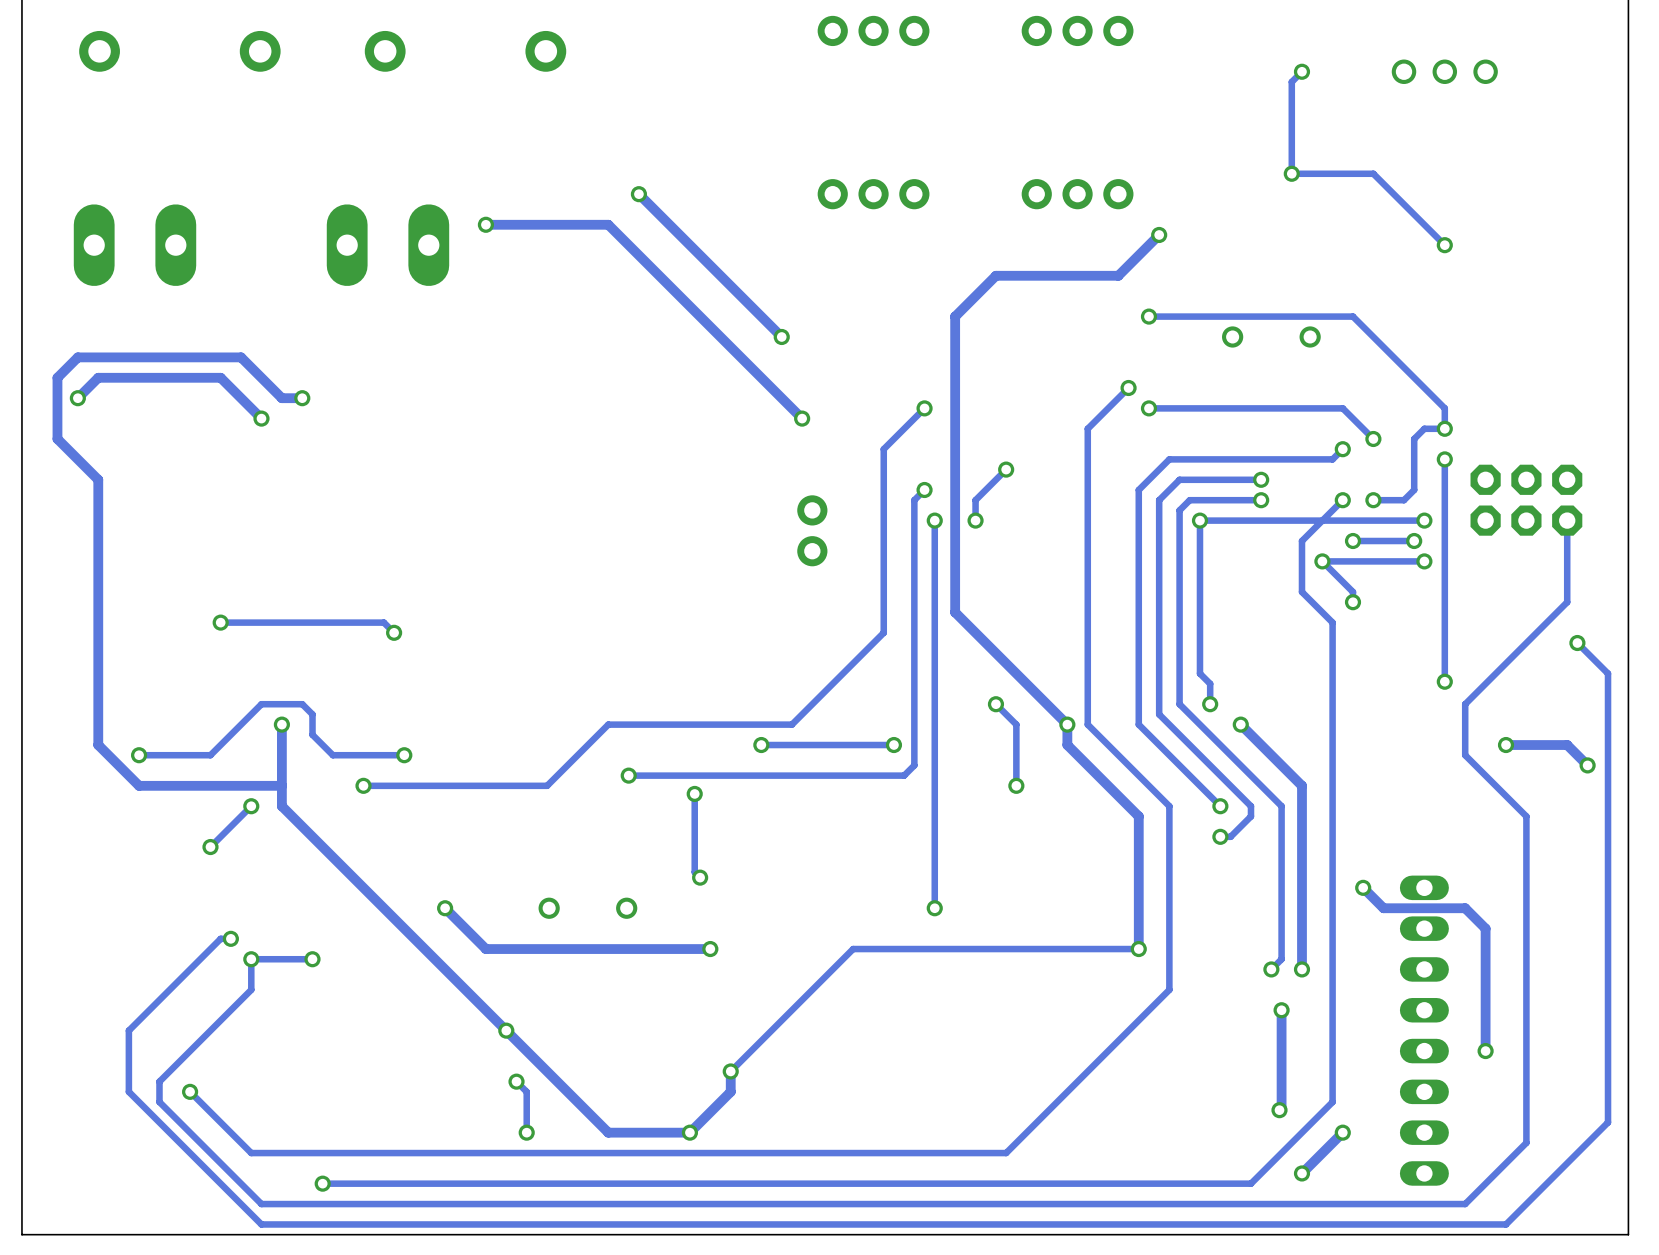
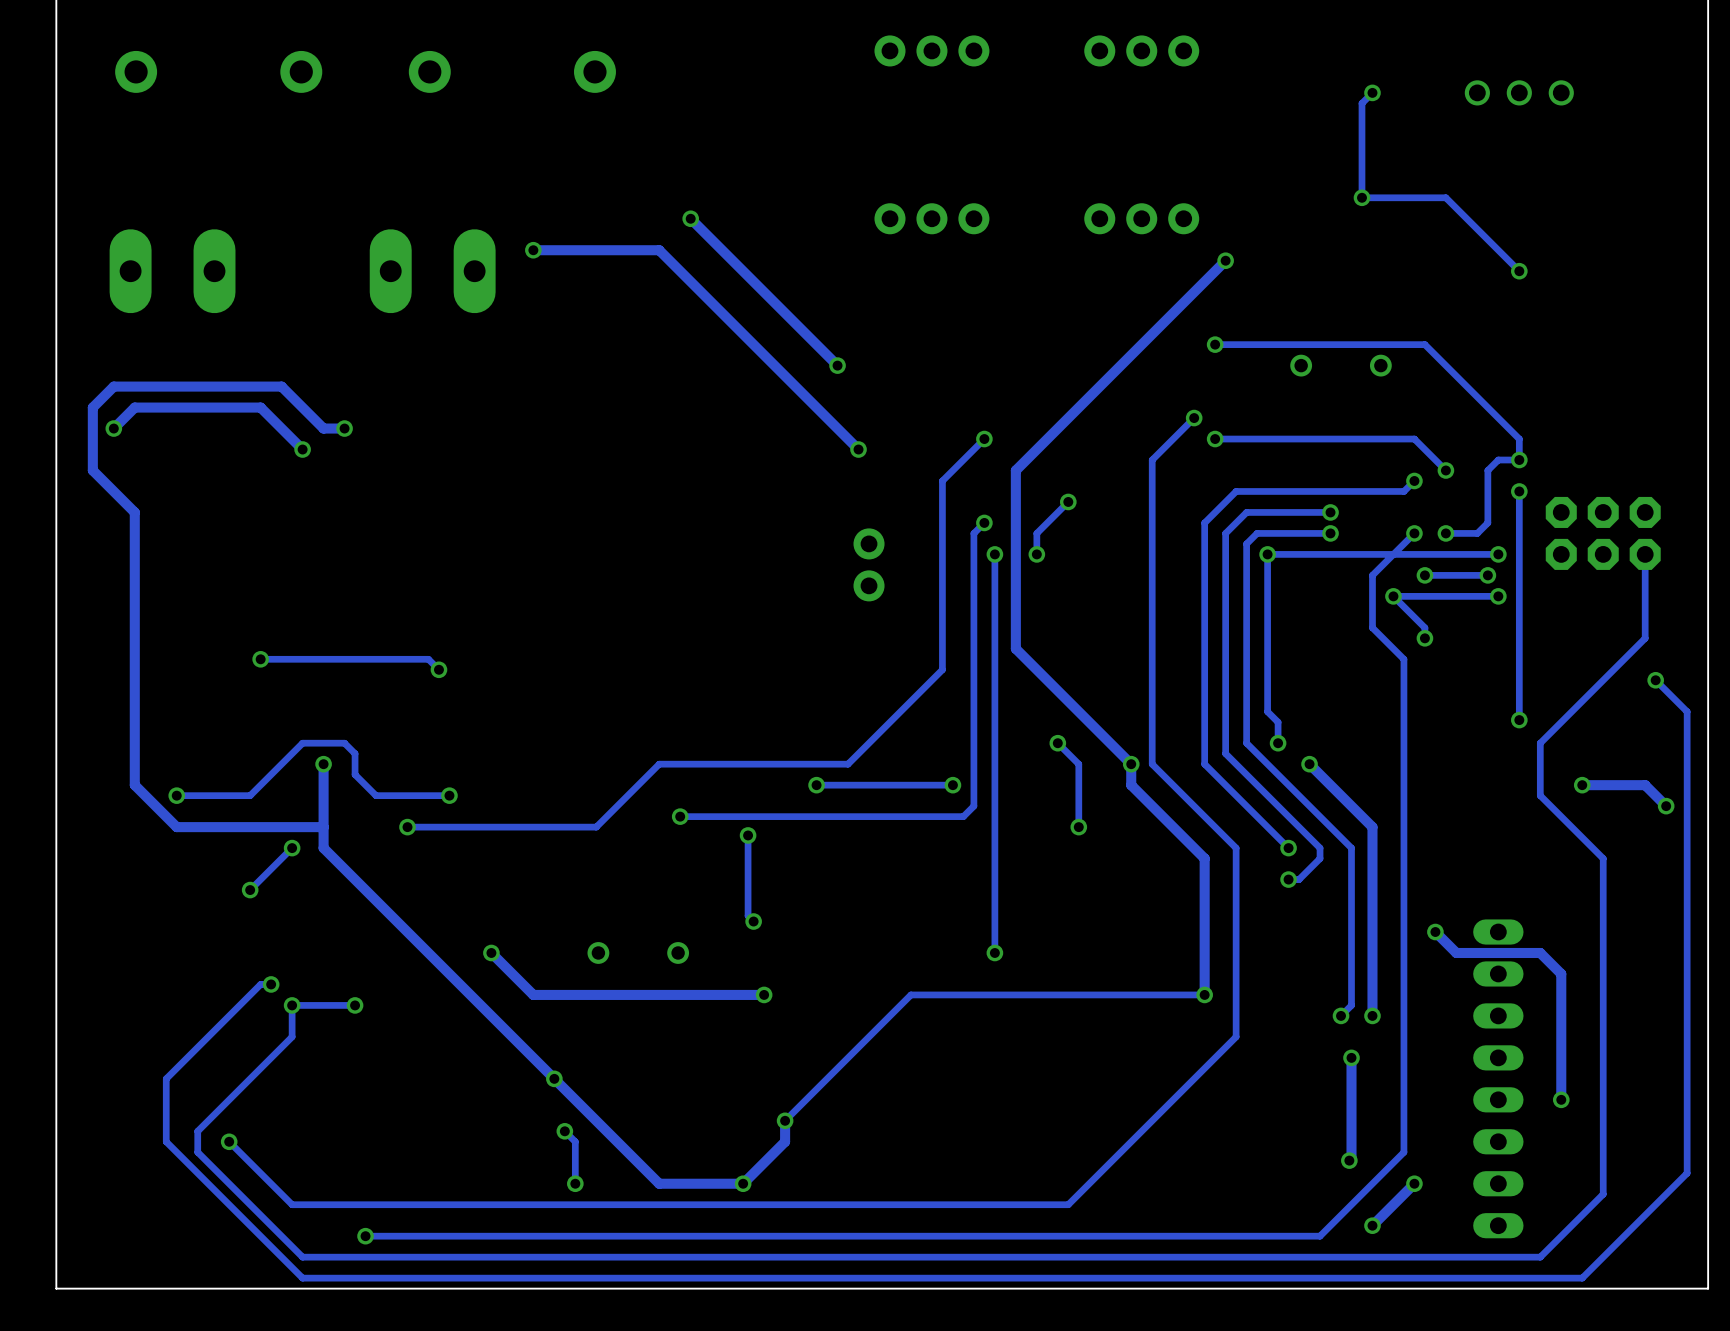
track: (1118, 275) (995, 275) (955, 316) (955, 438) -> (1183, 302) (1015, 470)

